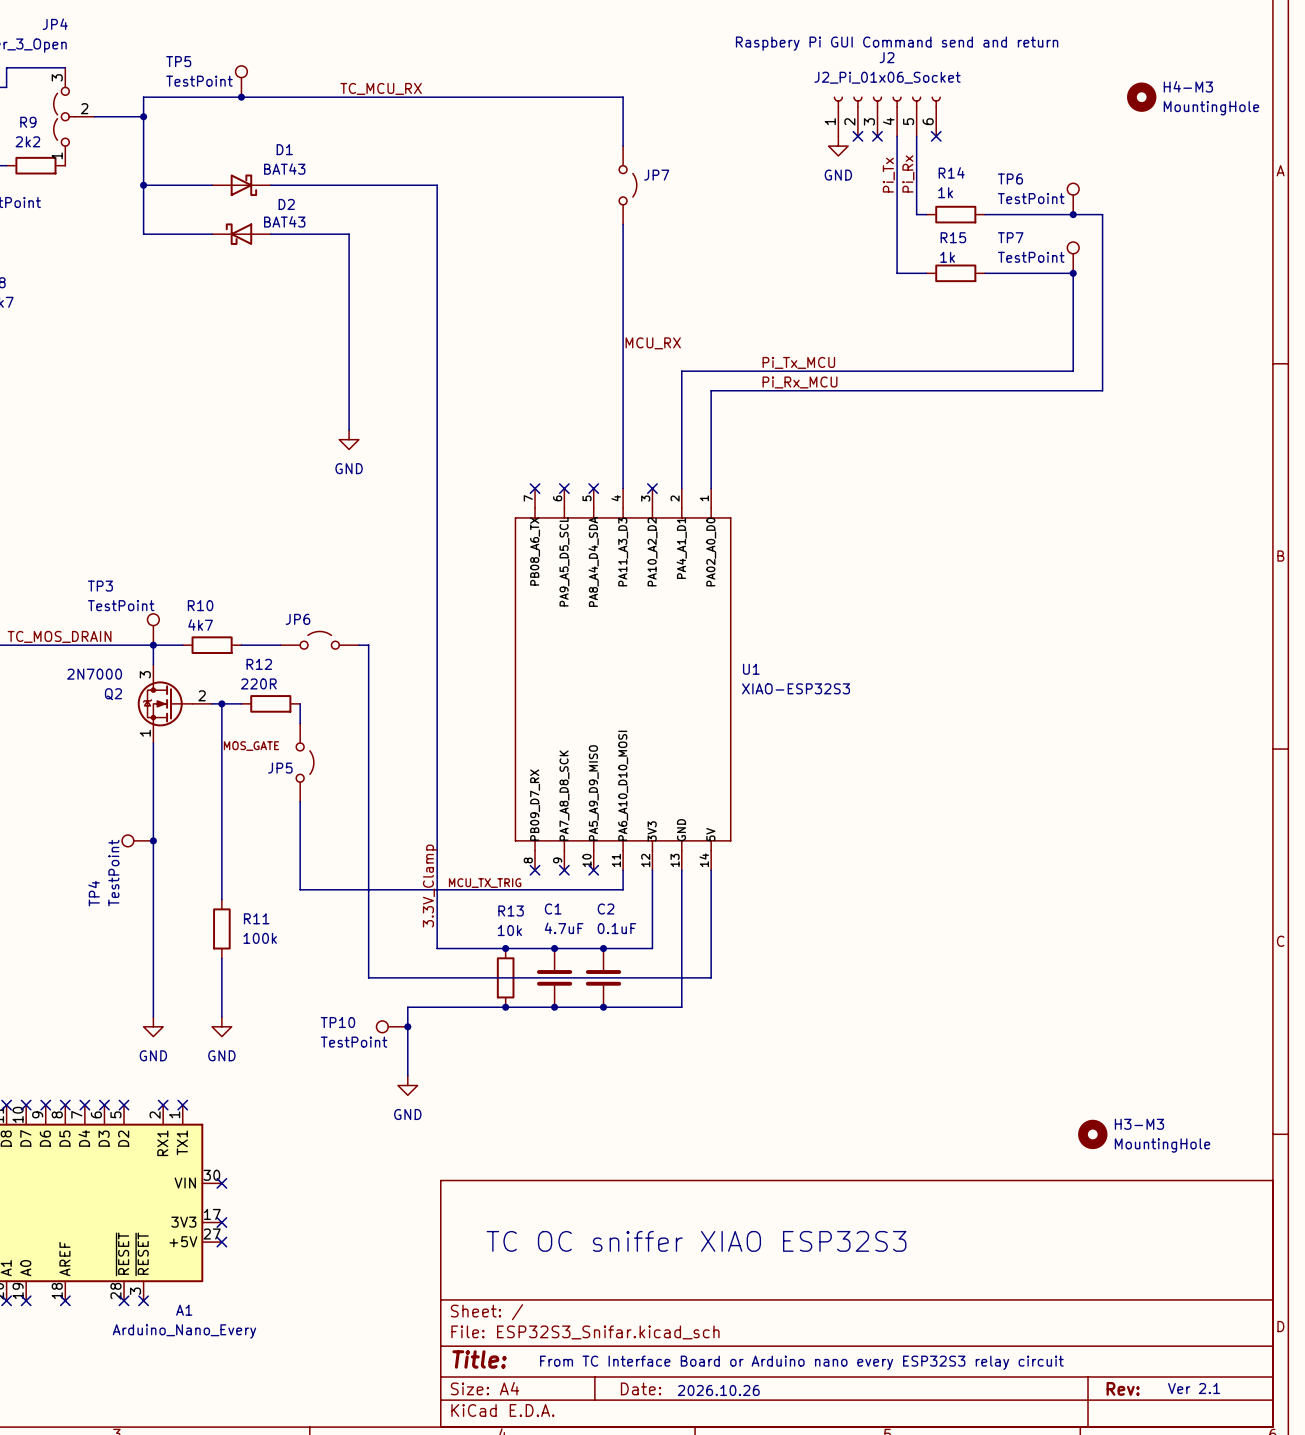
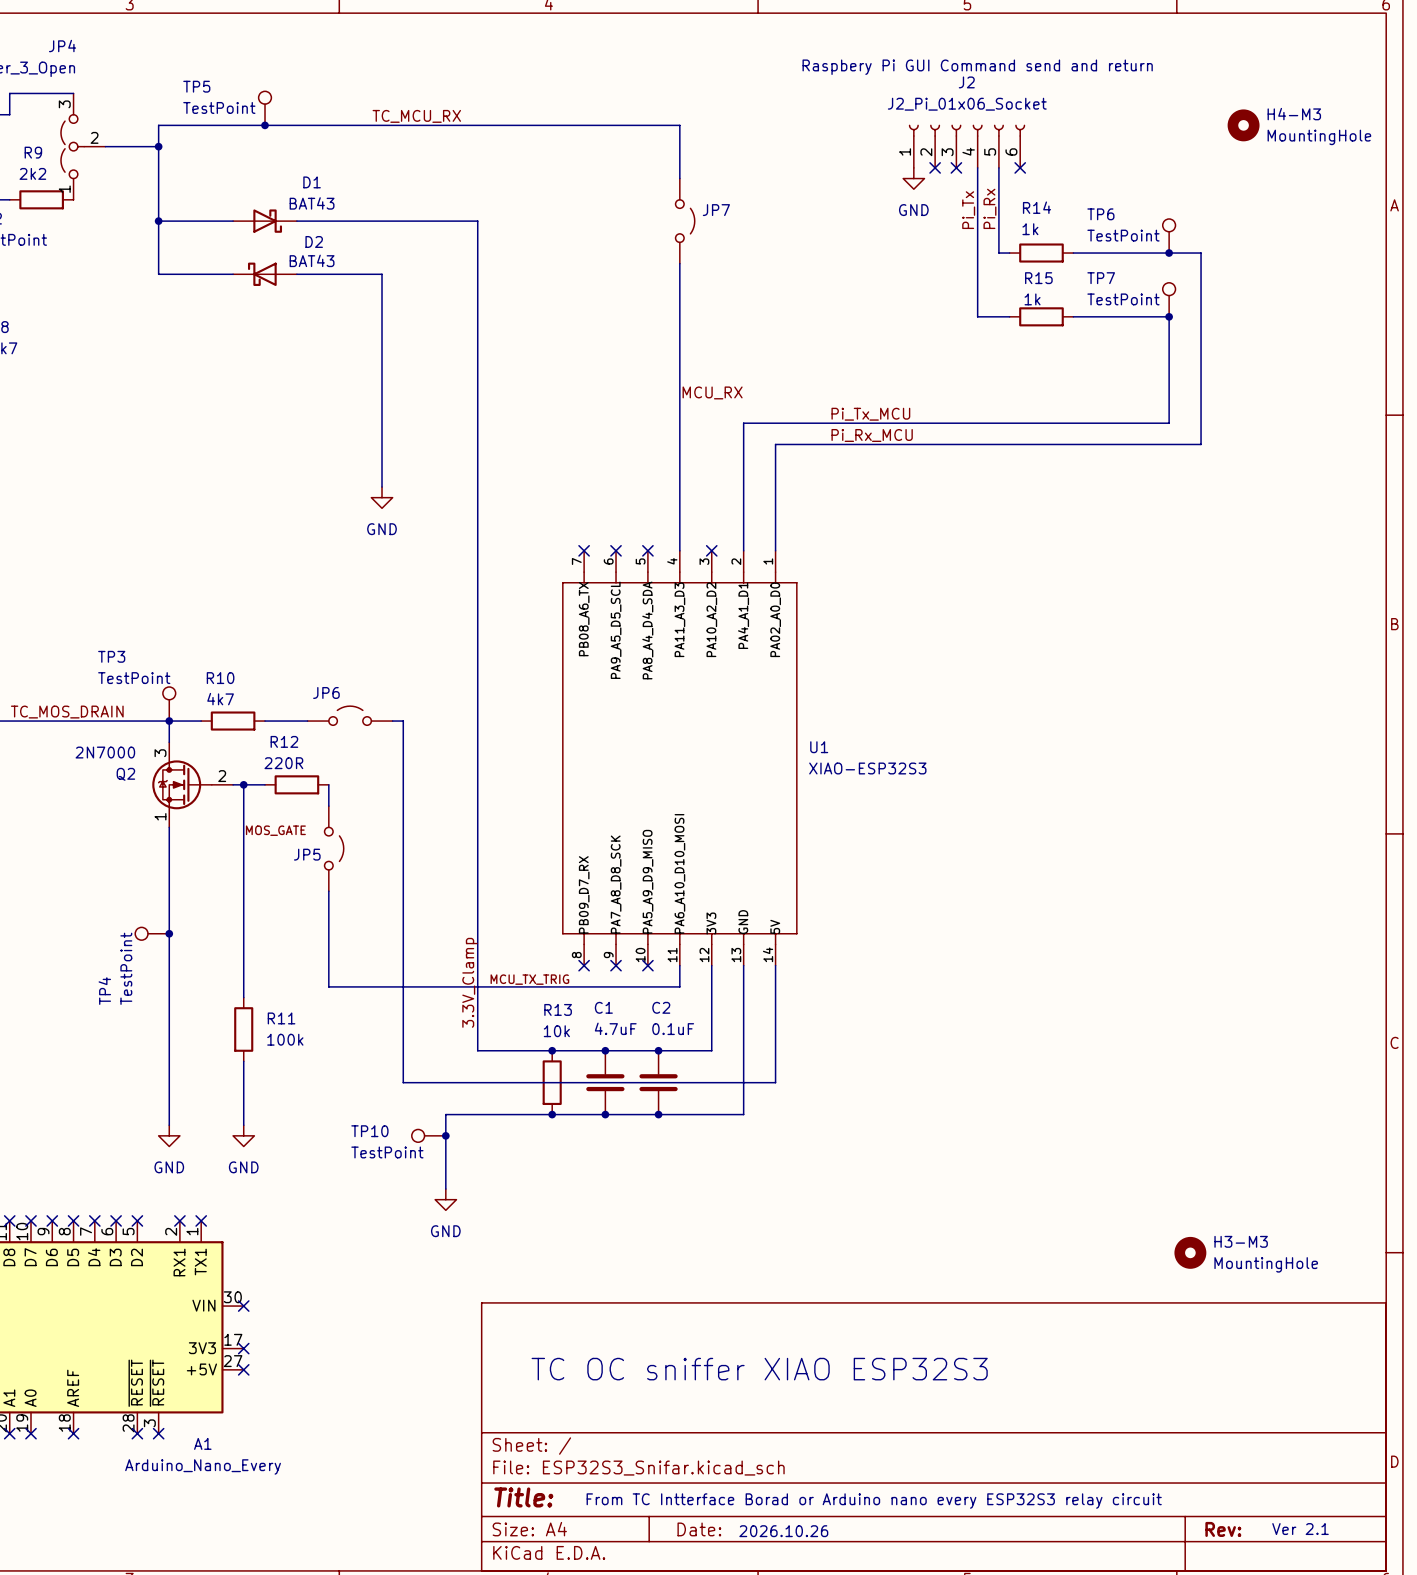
text: From TC Interface Board or Arduino nano every ESP32S3 relay circuit (801, 1362) -> From TC Intterface Borad or Arduino nano every ESP32S3 relay circuit (874, 1501)

